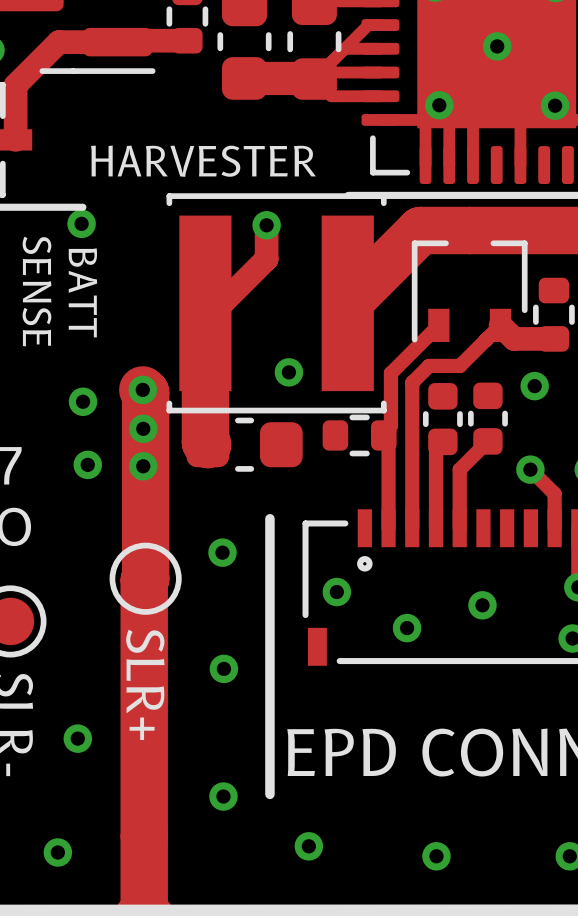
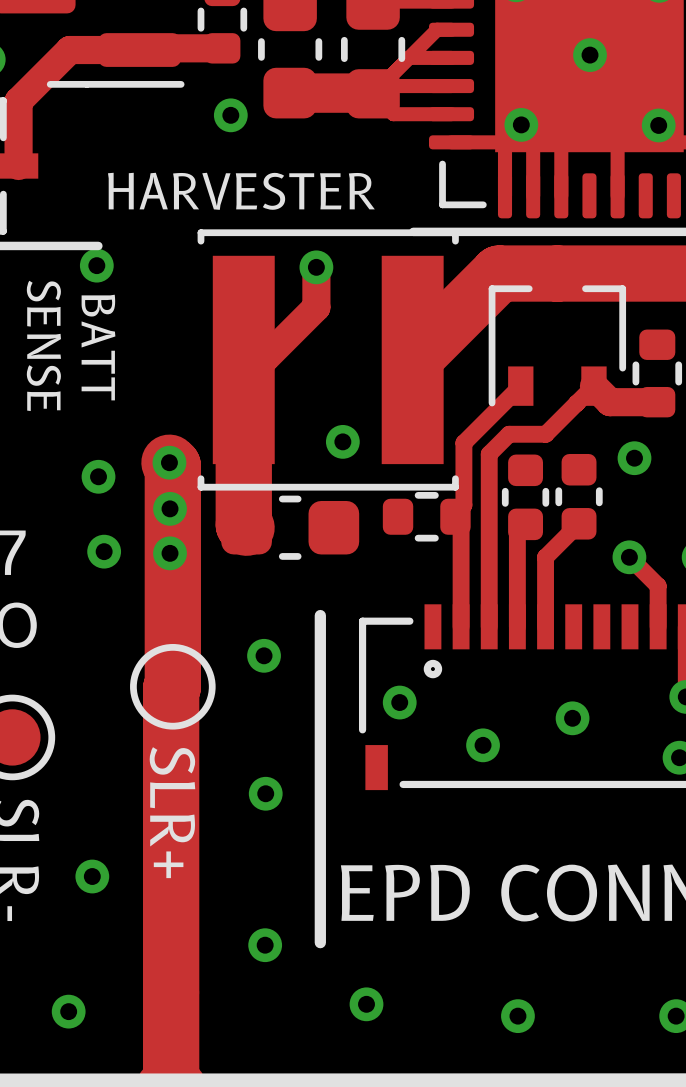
via: none -> (230, 115)

